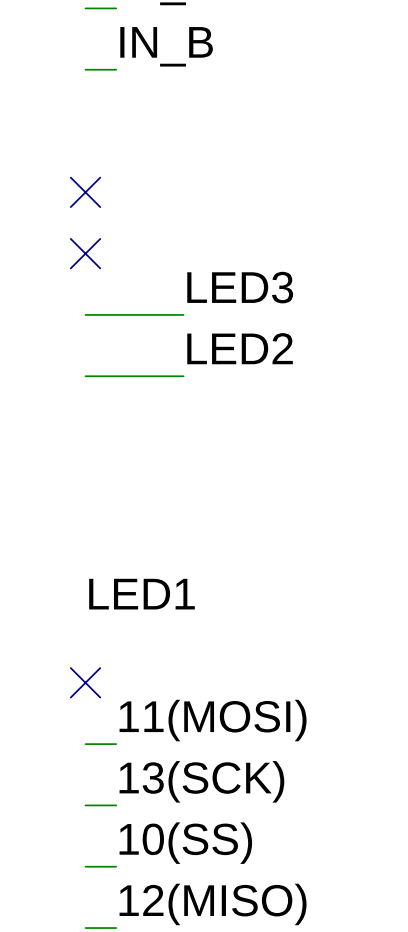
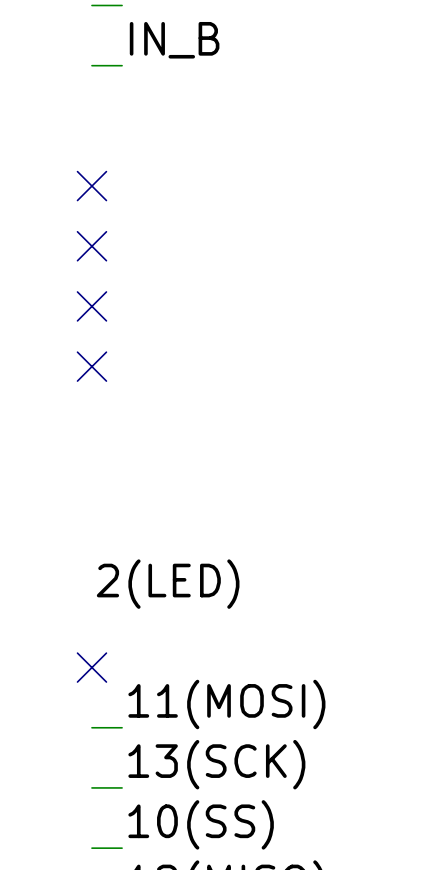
label: LED3 (240, 287) -> none
wire: (85, 314) (183, 314) -> none
no-connect mark: none -> (91, 306)
label: LED2 (240, 348) -> none
wire: (85, 376) (183, 376) -> none
no-connect mark: none -> (91, 366)
label: LED1 (141, 594) -> 2(LED) (168, 584)

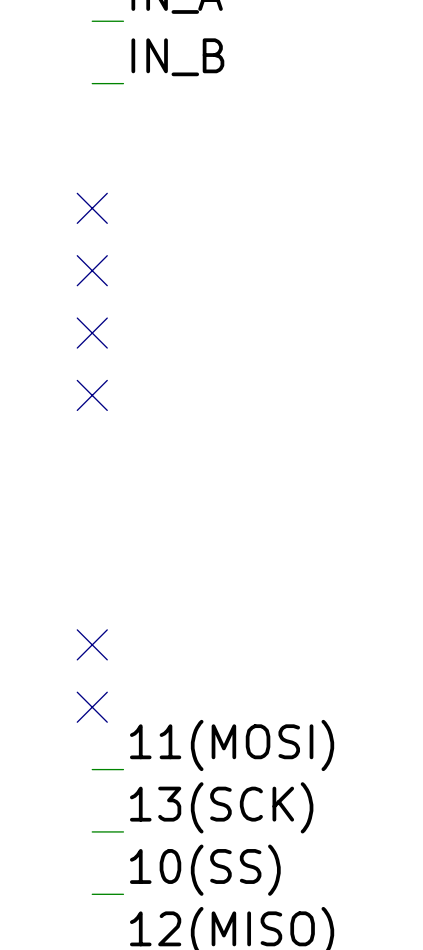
label: 2(LED) (168, 584) -> none
no-connect mark: none -> (92, 644)

